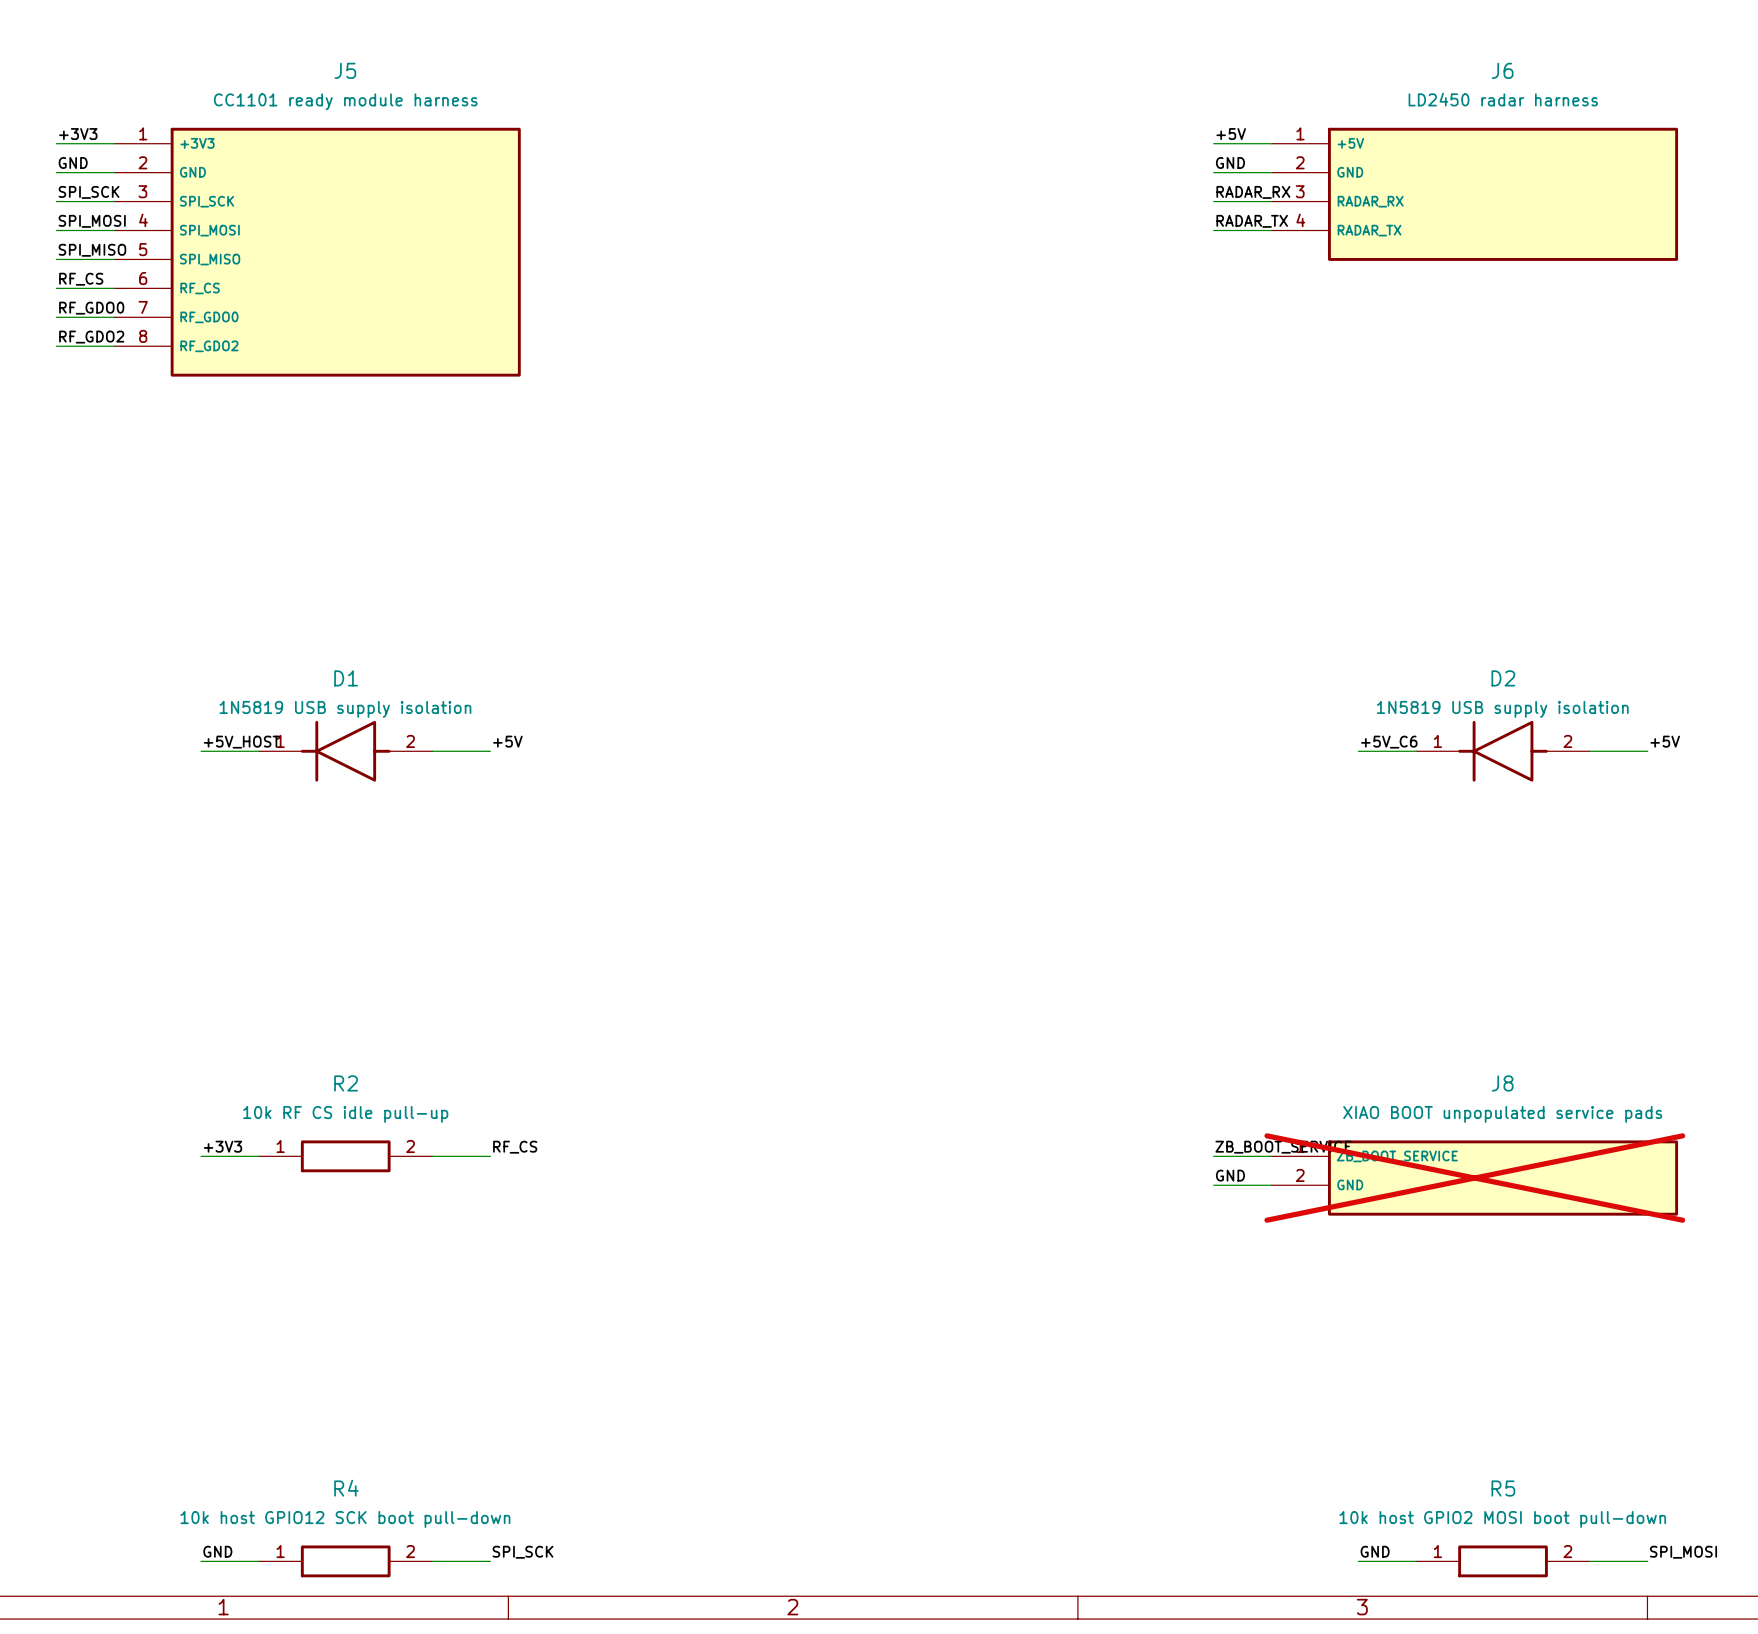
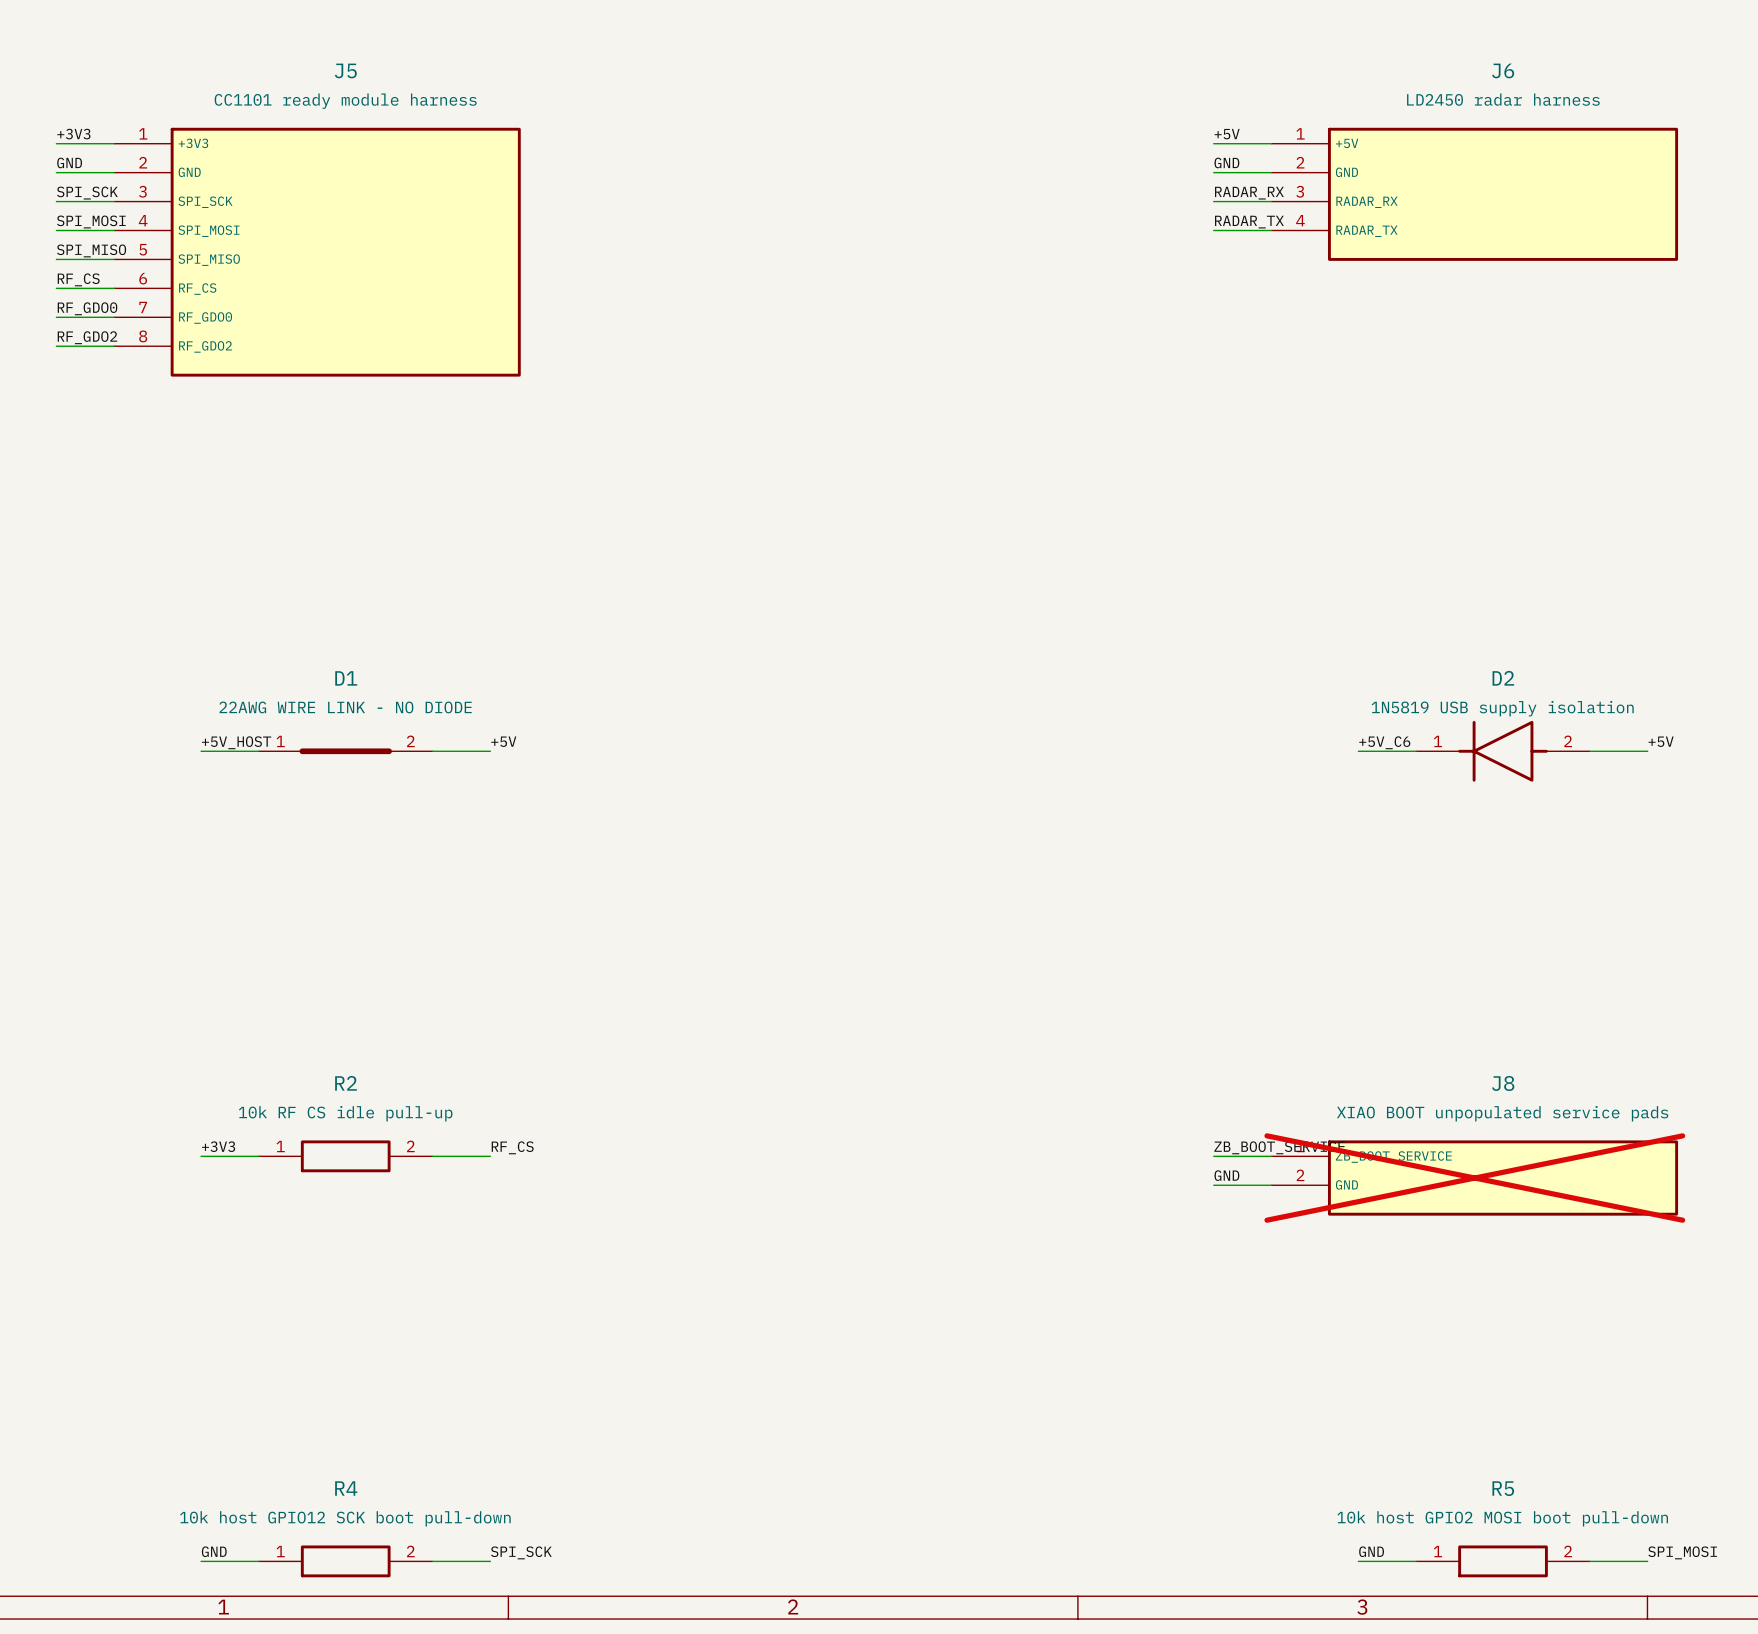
D1 value: 1N5819 USB supply isolation (345, 709) -> 22AWG WIRE LINK - NO DIODE (345, 707)
D1 symbol: [258, 720, 433, 782] -> [258, 748, 433, 755]

